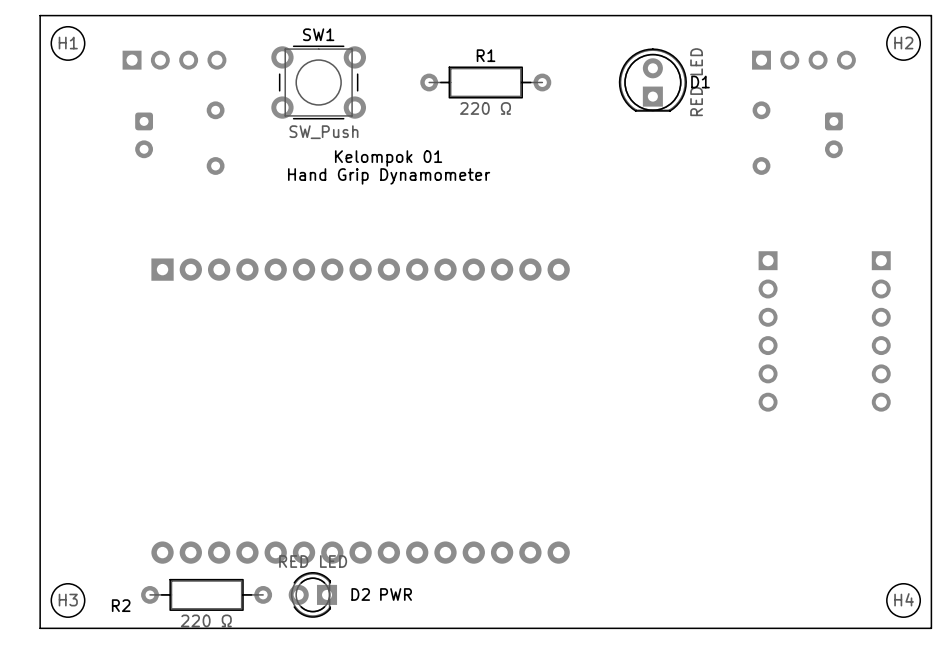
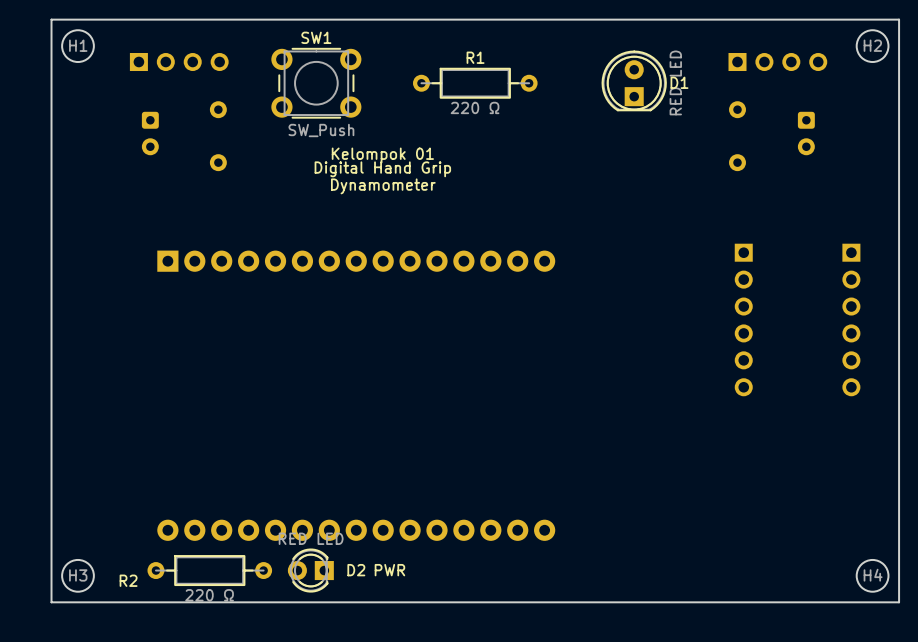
text: Hand Grip Dynamometer (389, 176) -> Digital Hand Grip (382, 169)
text: none -> Dynamometer (383, 186)

